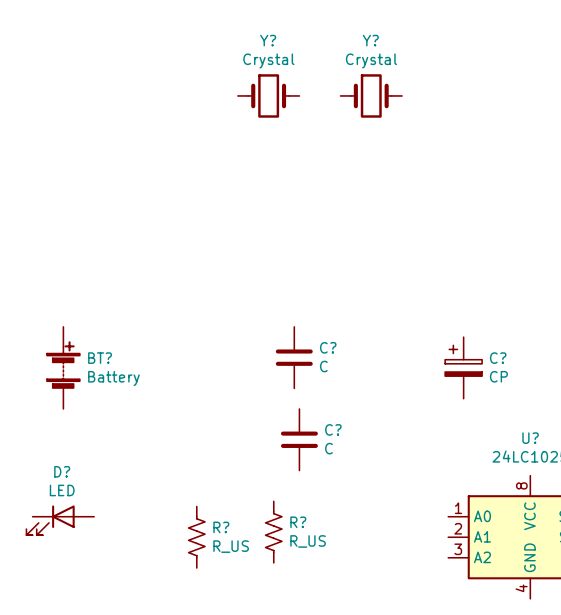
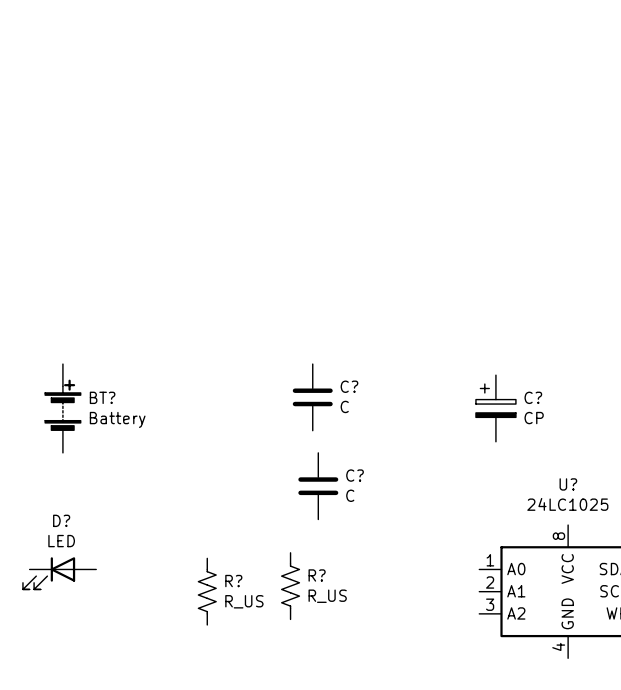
Y?: Crystal (268, 95) -> none
Y?: Crystal (371, 95) -> none

